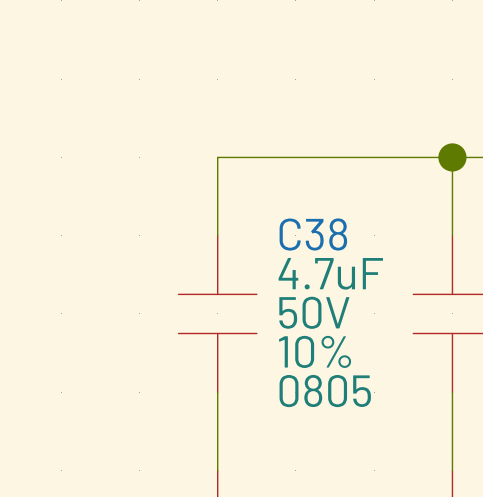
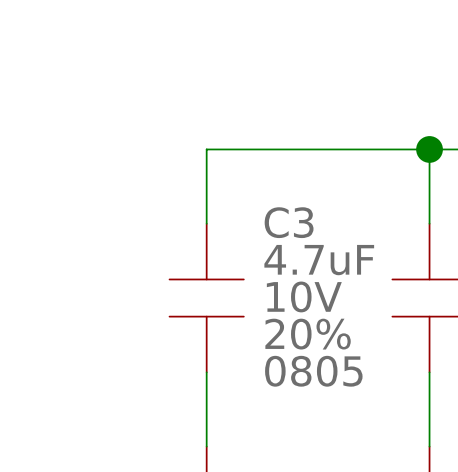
C38 name: C38 (313, 234) -> C3 (289, 222)
C38 text: 50V (314, 312) -> 10V (304, 296)
C38 text: 10% (315, 351) -> 20% (308, 334)

